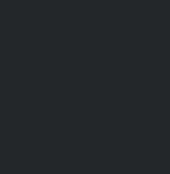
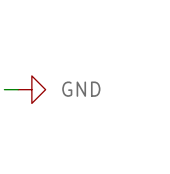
wire: none -> (4, 89) (18, 89)
power symbol: none -> GND (31, 89)

